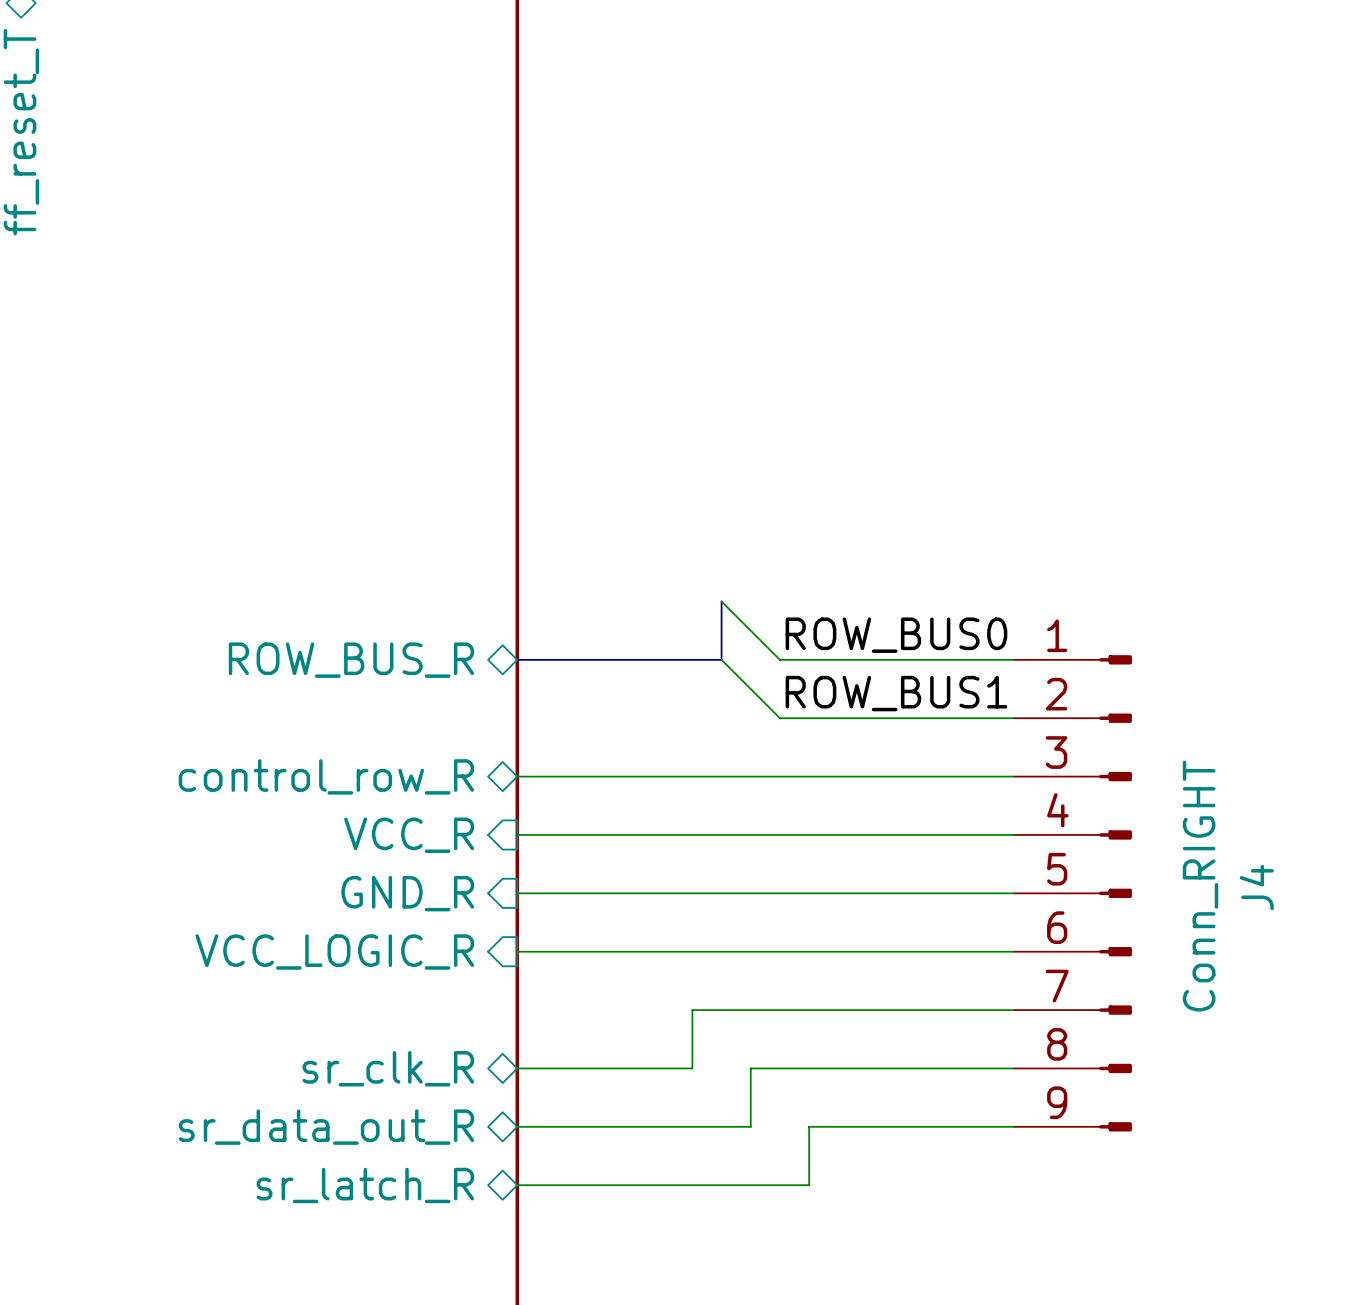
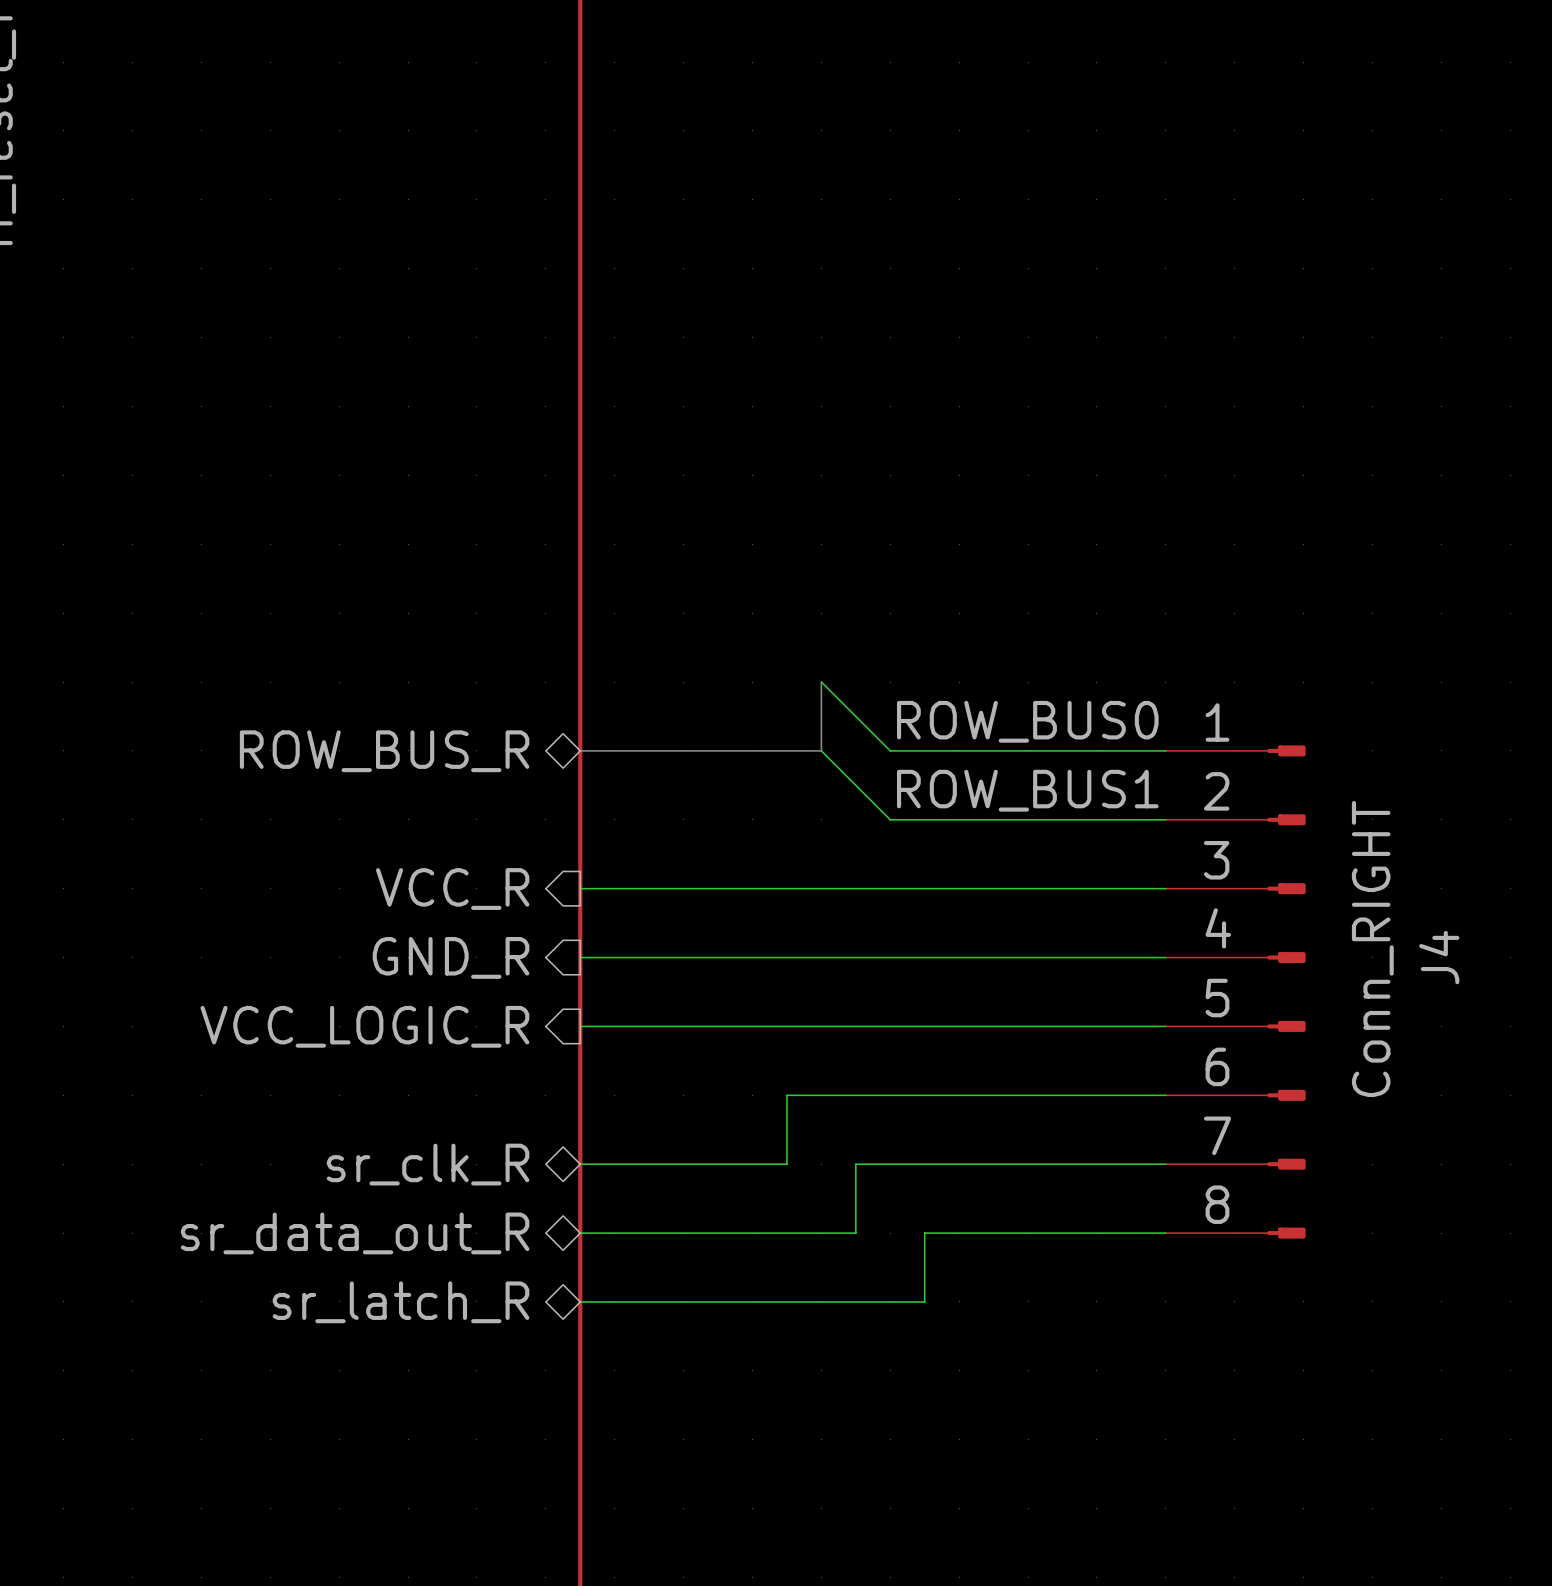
J4 symbol: [1013, 655, 1132, 1132] -> [1165, 745, 1306, 1239]
sheet pin shape: bidirectional (326, 776) -> input (452, 889)
sheet pin: control_row_R (326, 776) -> VCC_R (452, 889)
sheet pin: VCC_R (409, 835) -> GND_R (451, 957)
sheet pin: GND_R (407, 893) -> VCC_LOGIC_R (364, 1026)
wire: (517, 951) (692, 951) -> (580, 1164) (786, 1164) (786, 1095)
sheet pin: VCC_LOGIC_R (334, 952) -> none
sheet pin: none -> sr_clk_R (428, 1164)
wire: (750, 1010) (692, 1010) (692, 1068) -> (855, 1164) (855, 1233) (786, 1233)
sheet pin: sr_clk_R (388, 1068) -> sr_data_out_R (355, 1233)
wire: (809, 1068) (750, 1068) (750, 1126) -> (924, 1233) (924, 1301) (855, 1301)
wire: (1013, 1126) (809, 1126) (809, 1185) (517, 1185) -> none
sheet pin: sr_data_out_R (326, 1127) -> sr_latch_R (401, 1302)
sheet pin: sr_latch_R (365, 1185) -> none

